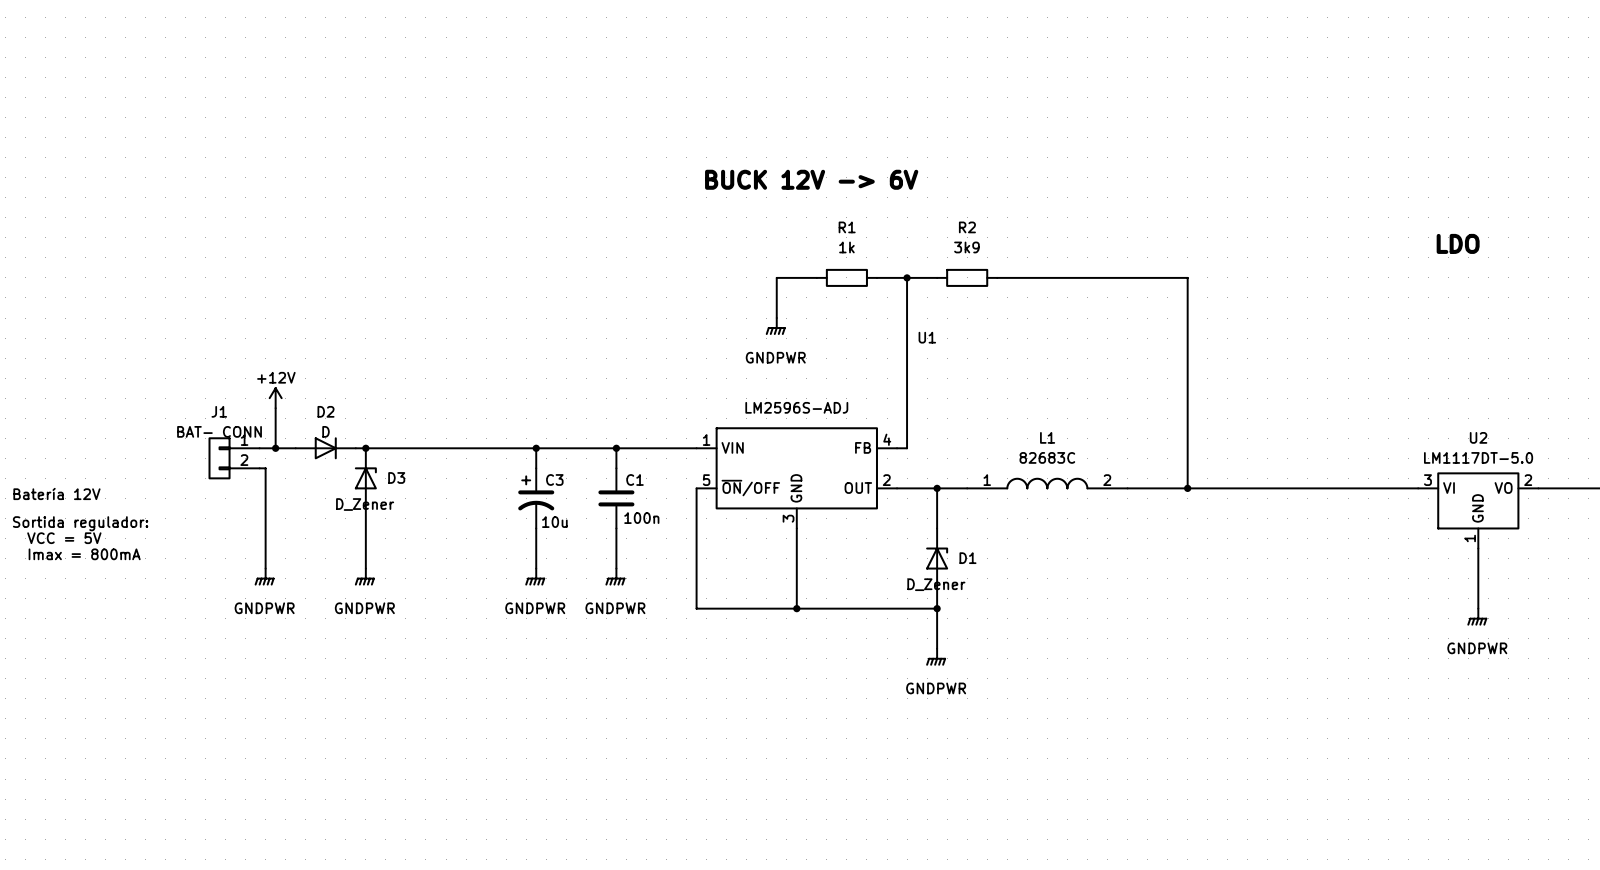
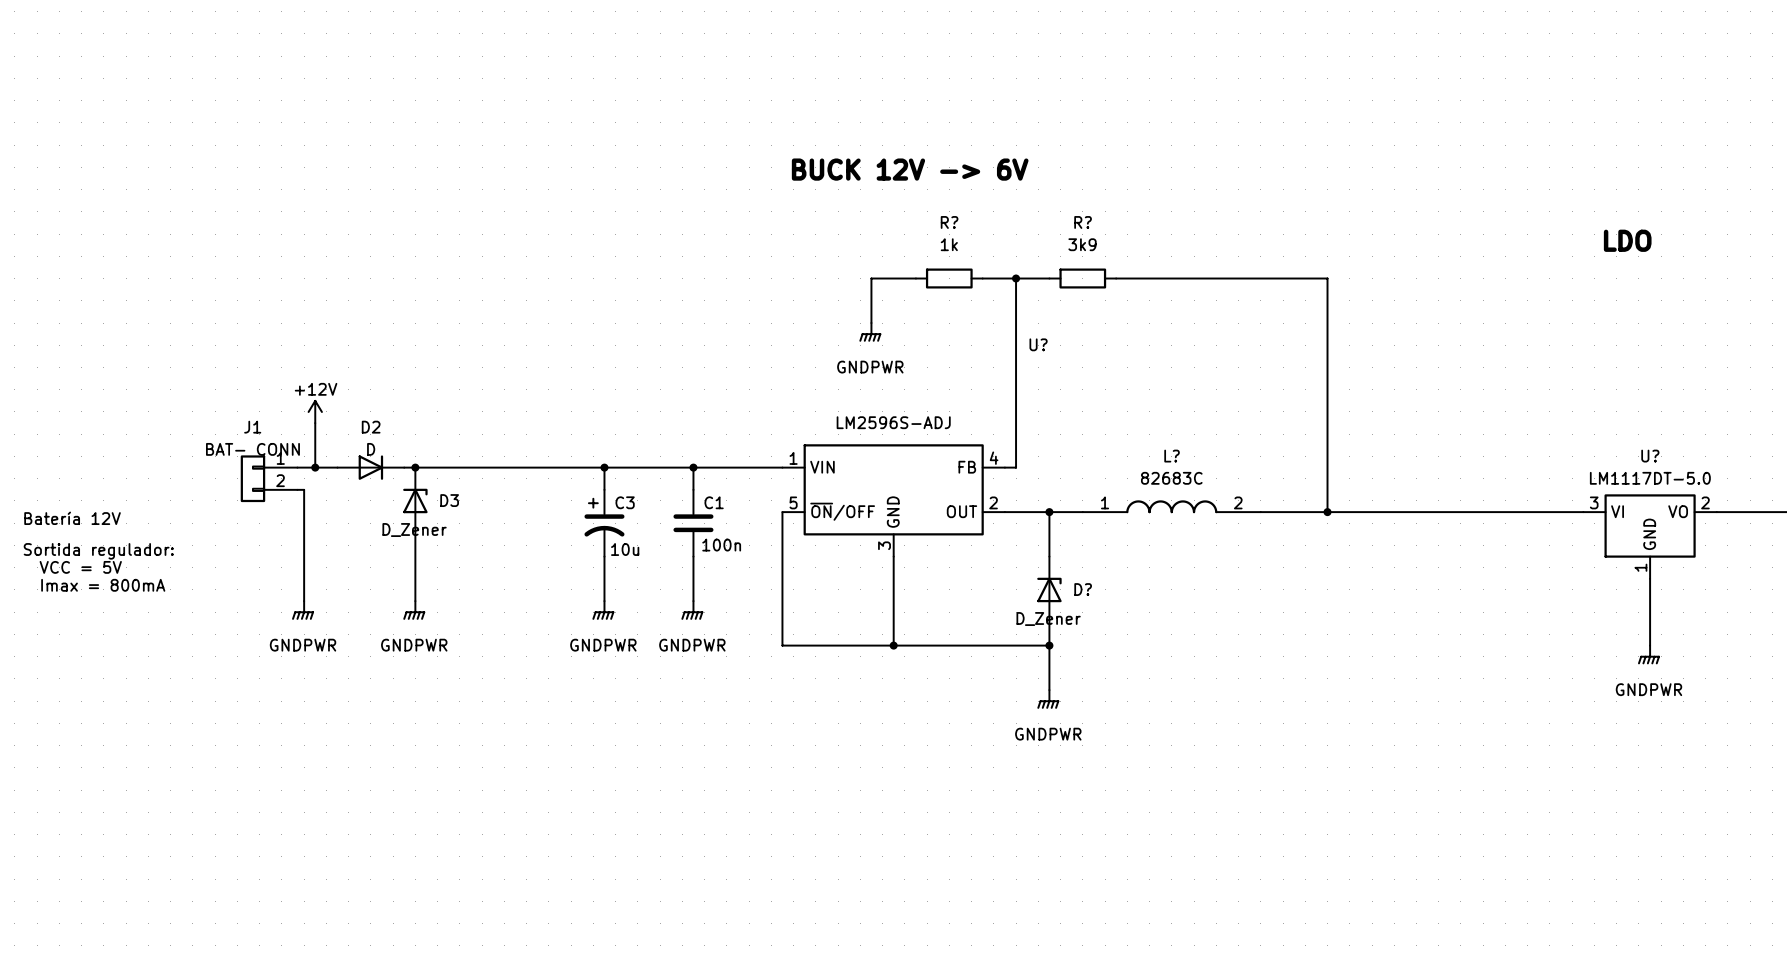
R1 name: R1 (847, 227) -> R? (949, 222)
R2 name: R2 (967, 227) -> R? (1083, 222)
U1 name: U1 (927, 337) -> U? (1038, 344)
L1 name: L1 (1047, 437) -> L? (1172, 456)
U2 name: U2 (1478, 437) -> U? (1650, 456)
D1 name: D1 (967, 558) -> D? (1083, 589)

